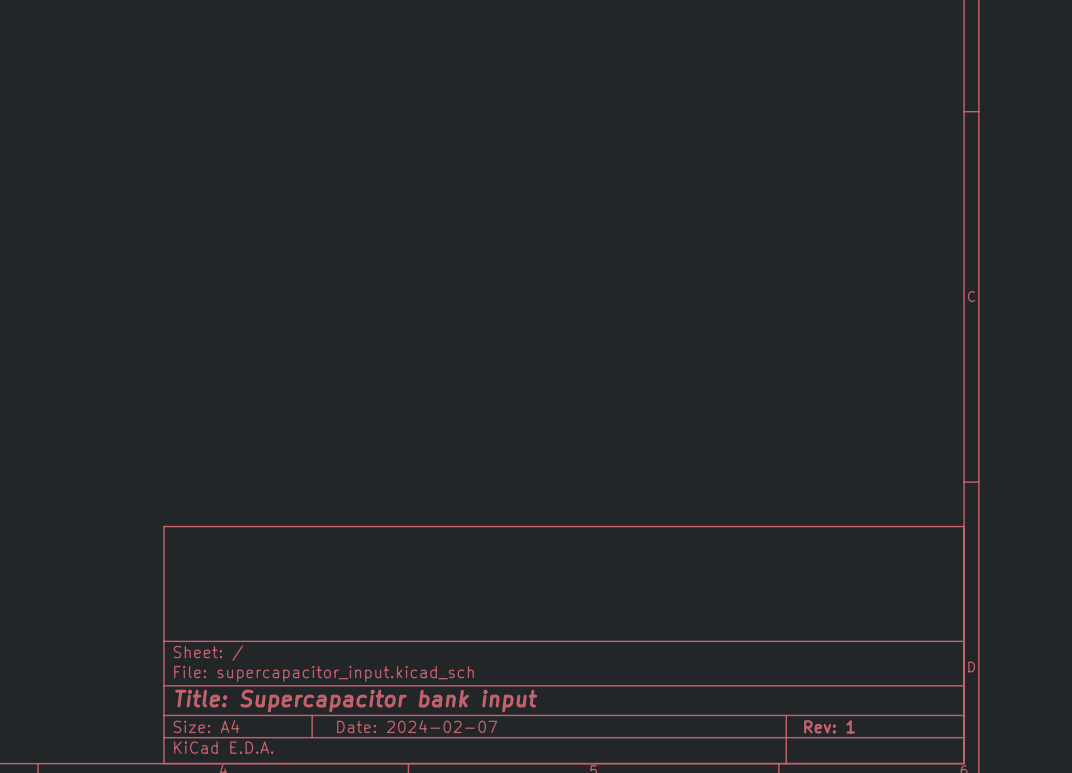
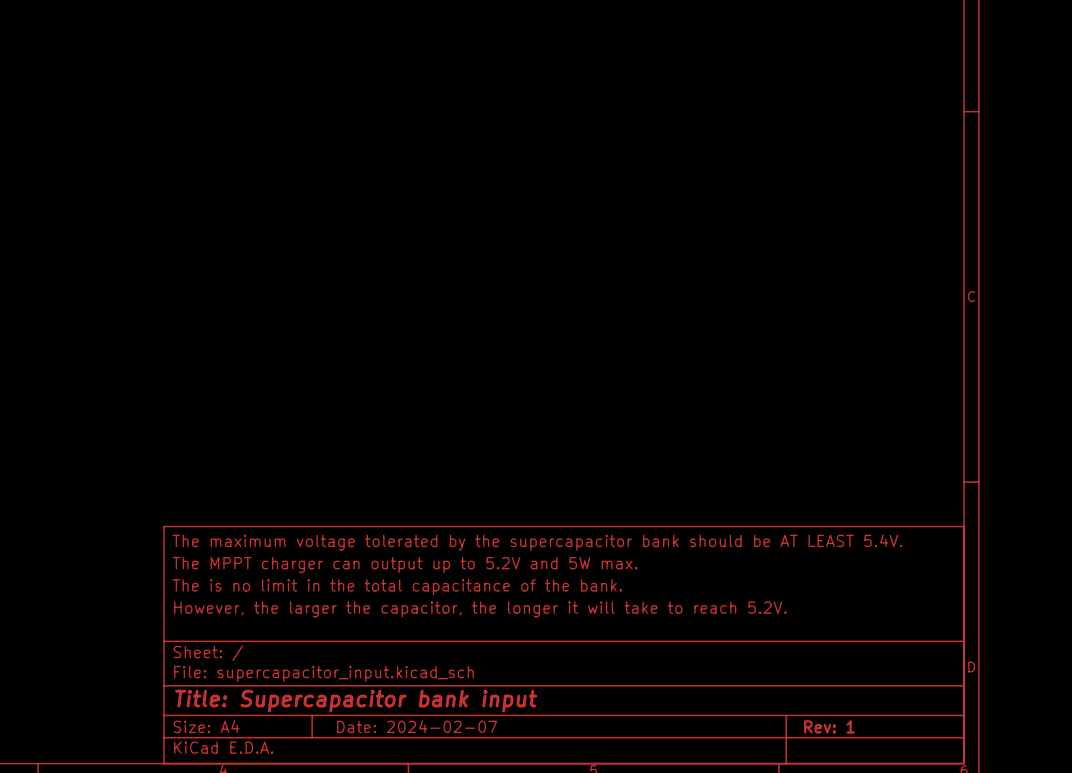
title block: none -> The maximum voltage tolerated by the supercapacitor bank should be AT LEAST 5.4V. (537, 542)
title block: none -> The MPPT charger can output up to 5.2V and 5W max. (404, 565)
title block: none -> The is no limit in the total capacitance of the bank. (397, 587)
title block: none -> However, the larger the capacitor, the longer it will take to reach 5.2V. (480, 609)

